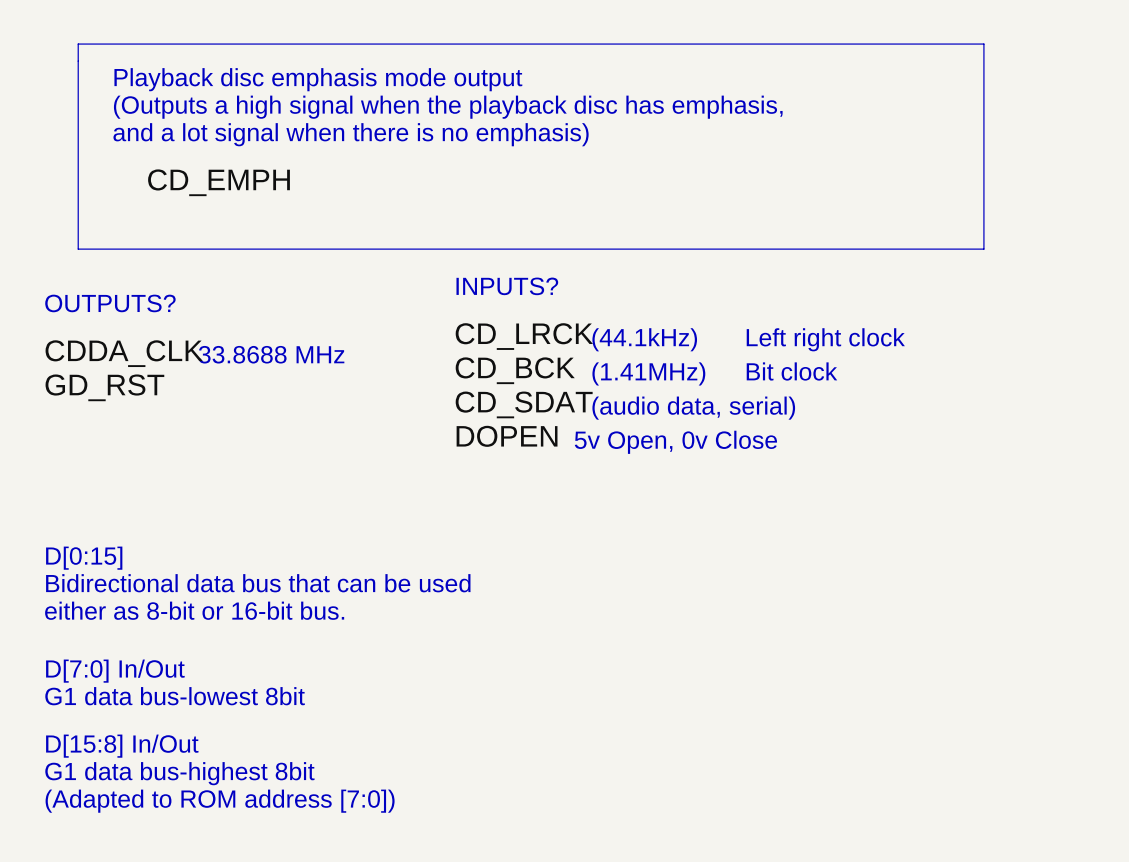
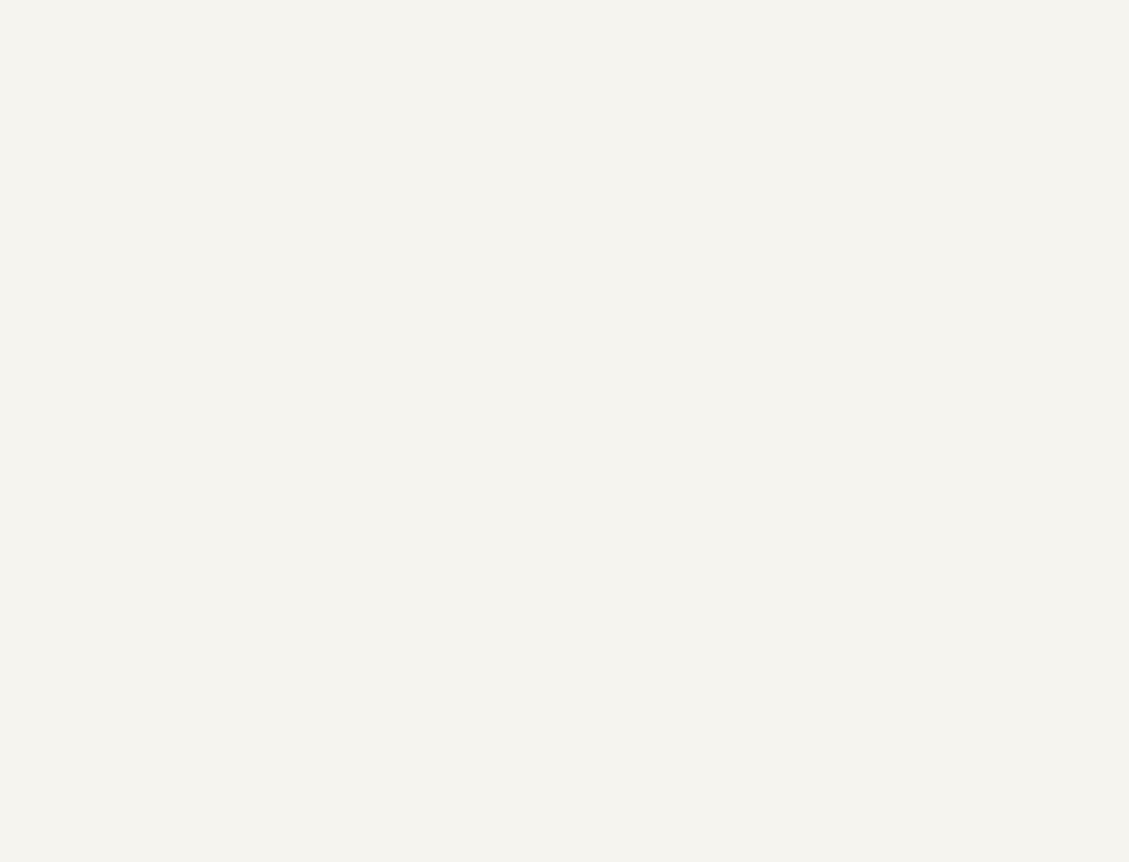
line: (78, 44) (78, 249) (983, 249) (983, 44) (78, 44) -> none
text: Playback disc emphasis mode output (318, 79) -> none
text: (Outputs a high signal when the playback disc has emphasis, (448, 107) -> none
text: and a lot signal when there is no emphasis) (351, 134) -> none
label: CD_EMPH (219, 182) -> none
text: INPUTS? (507, 286) -> none
text: OUTPUTS? (110, 303) -> none
label: CD_LRCK (524, 336) -> none
text: (44.1kHz) (644, 339) -> none
text: Left right clock (825, 339) -> none
label: CDDA_CLK (124, 353) -> none
text: 33.8688 MHz (271, 354) -> none
label: CD_BCK (515, 370) -> none
text: Bit clock (791, 371) -> none
text: (1.41MHz) (648, 373) -> none
label: GD_RST (104, 387) -> none
label: CD_SDAT (524, 404) -> none
text: (audio data, serial) (693, 408) -> none
label: DOPEN (507, 436) -> none
text: 5v Open, 0v Close (675, 442) -> none
text: D[0:15] (84, 558) -> none
text: Bidirectional data bus that can be used (258, 583) -> none
text: either as 8-bit or 16-bit bus. (194, 610) -> none
text: D[7:0] In/Out (115, 671) -> none
text: G1 data bus-lowest 8bit (175, 696) -> none
text: D[15:8] In/Out (122, 746) -> none
text: G1 data bus-highest 8bit (179, 773) -> none
text: (Adapted to ROM address [7:0]) (220, 801) -> none

